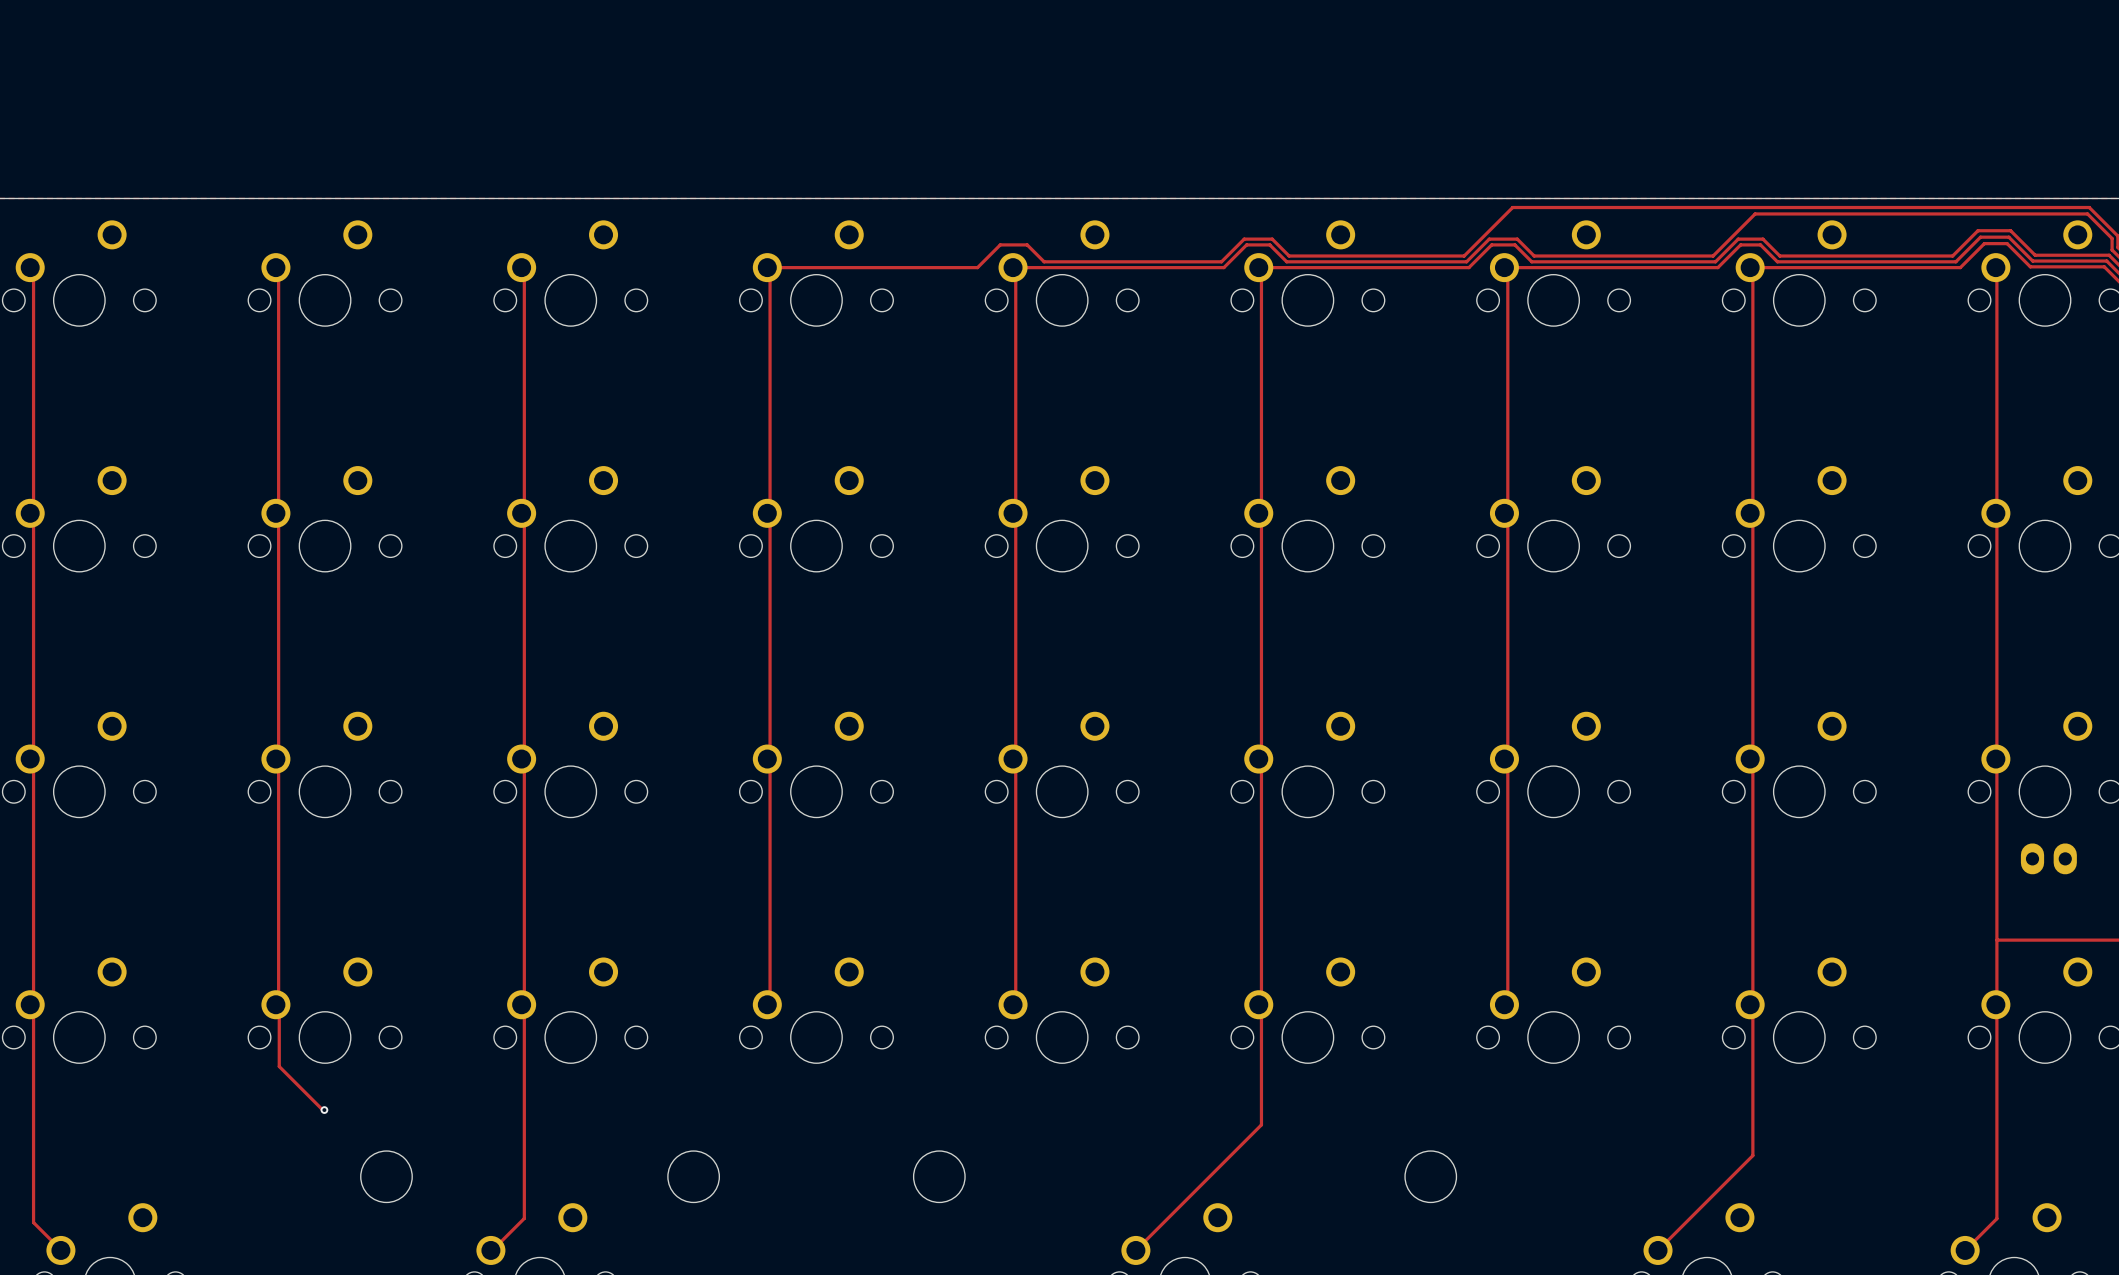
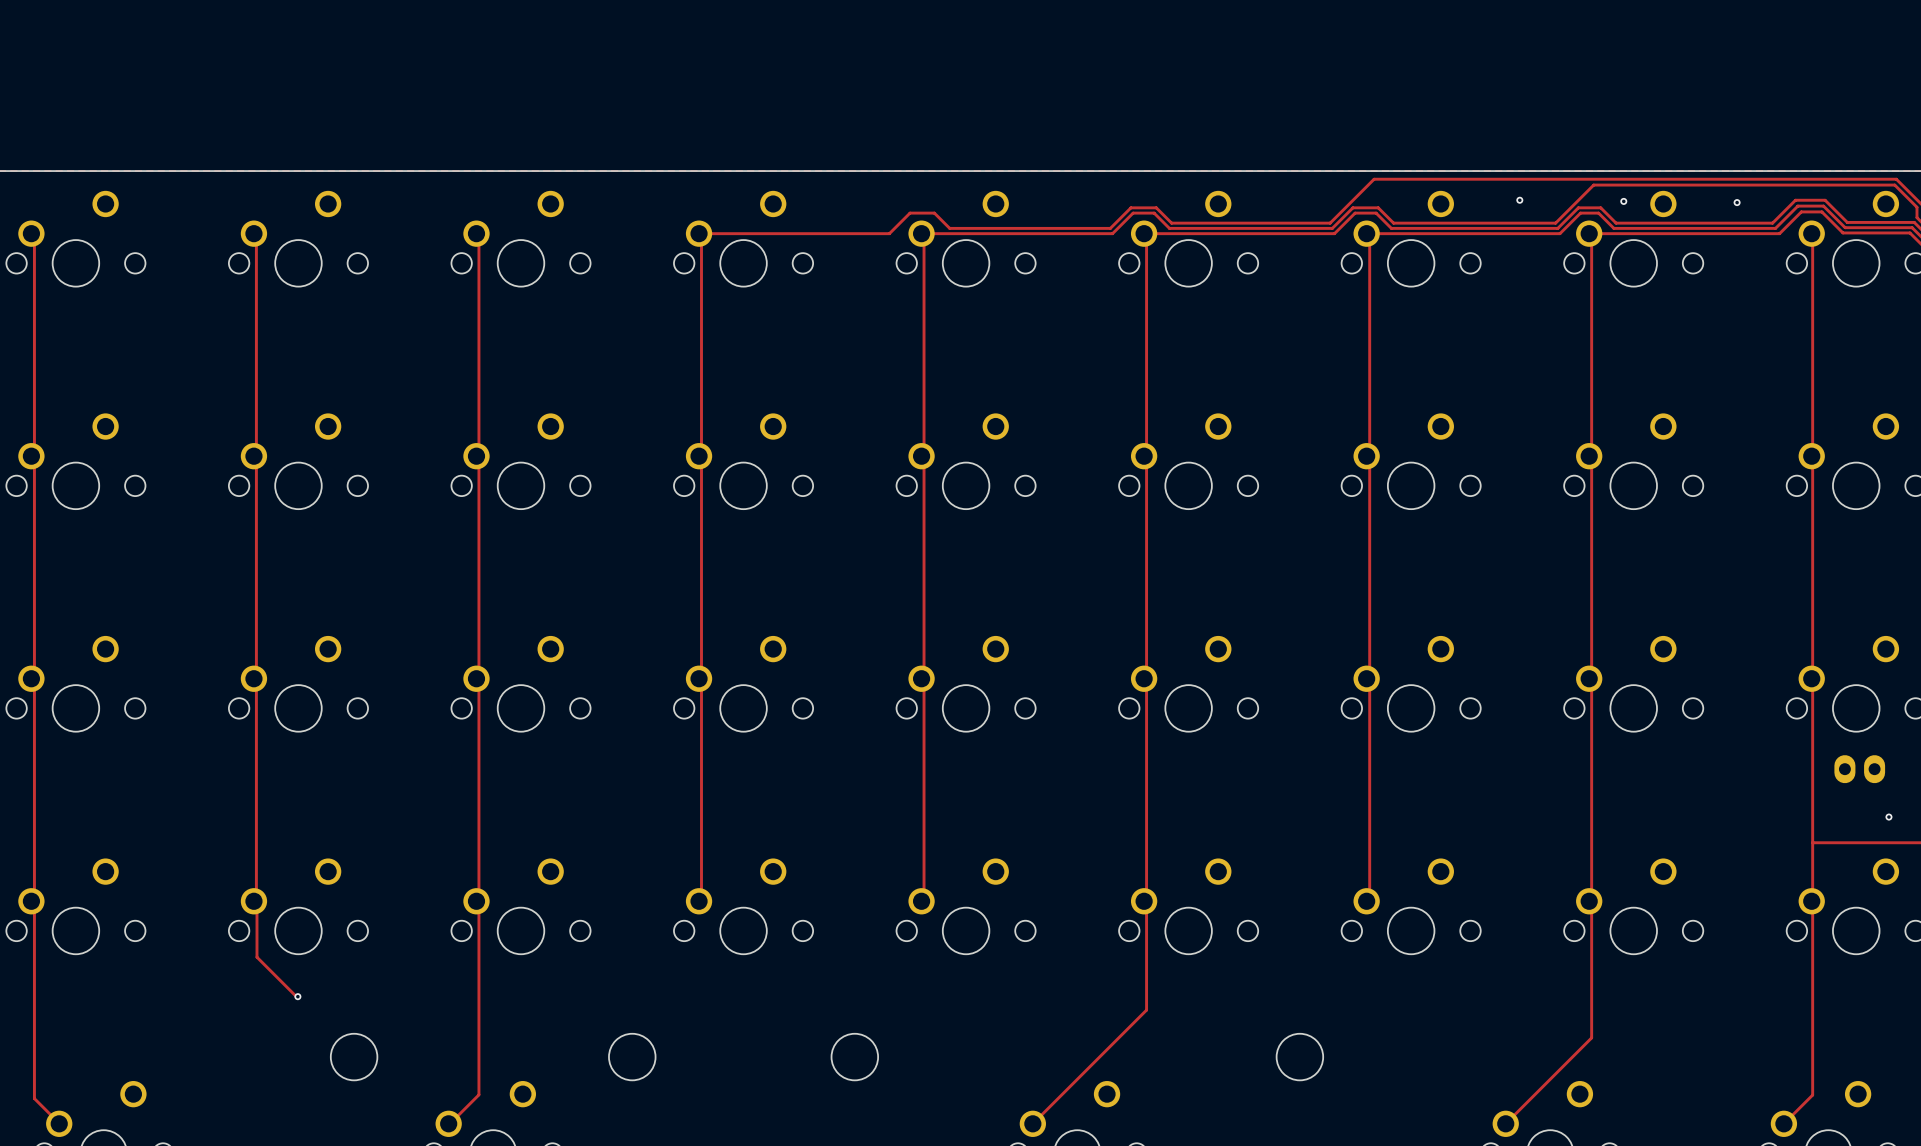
via: none -> (1519, 200)
via: none -> (1623, 201)
via: none -> (1737, 202)
via: none -> (1888, 817)

